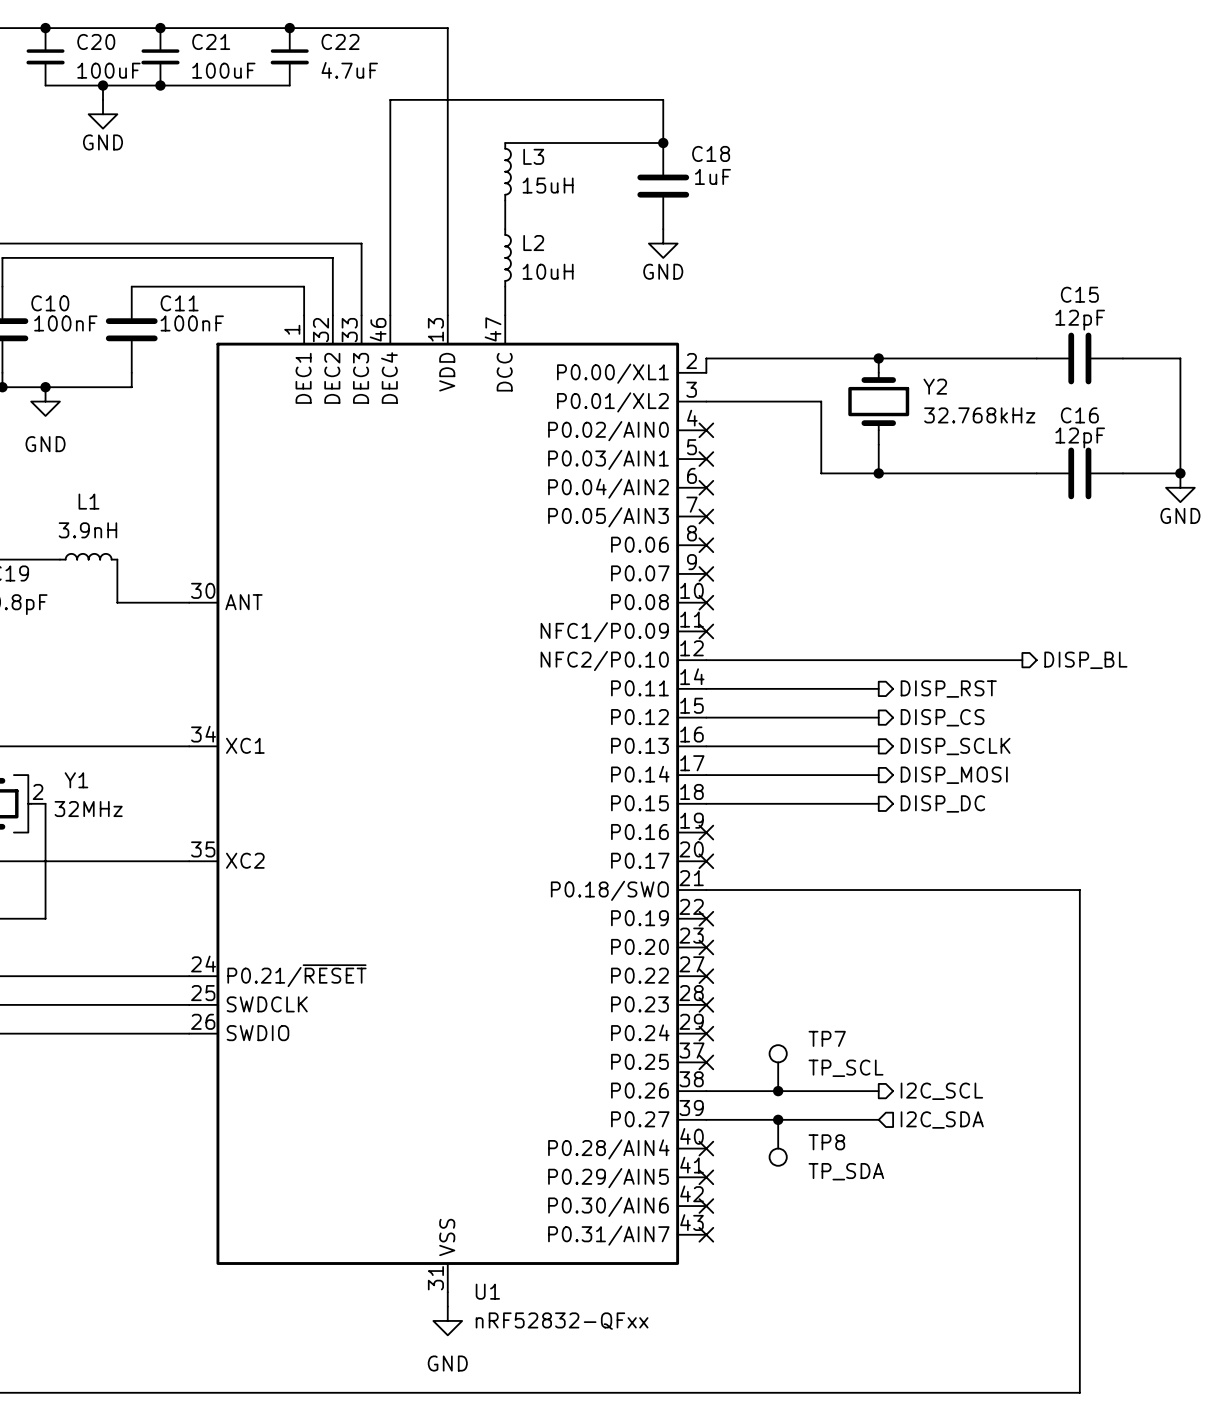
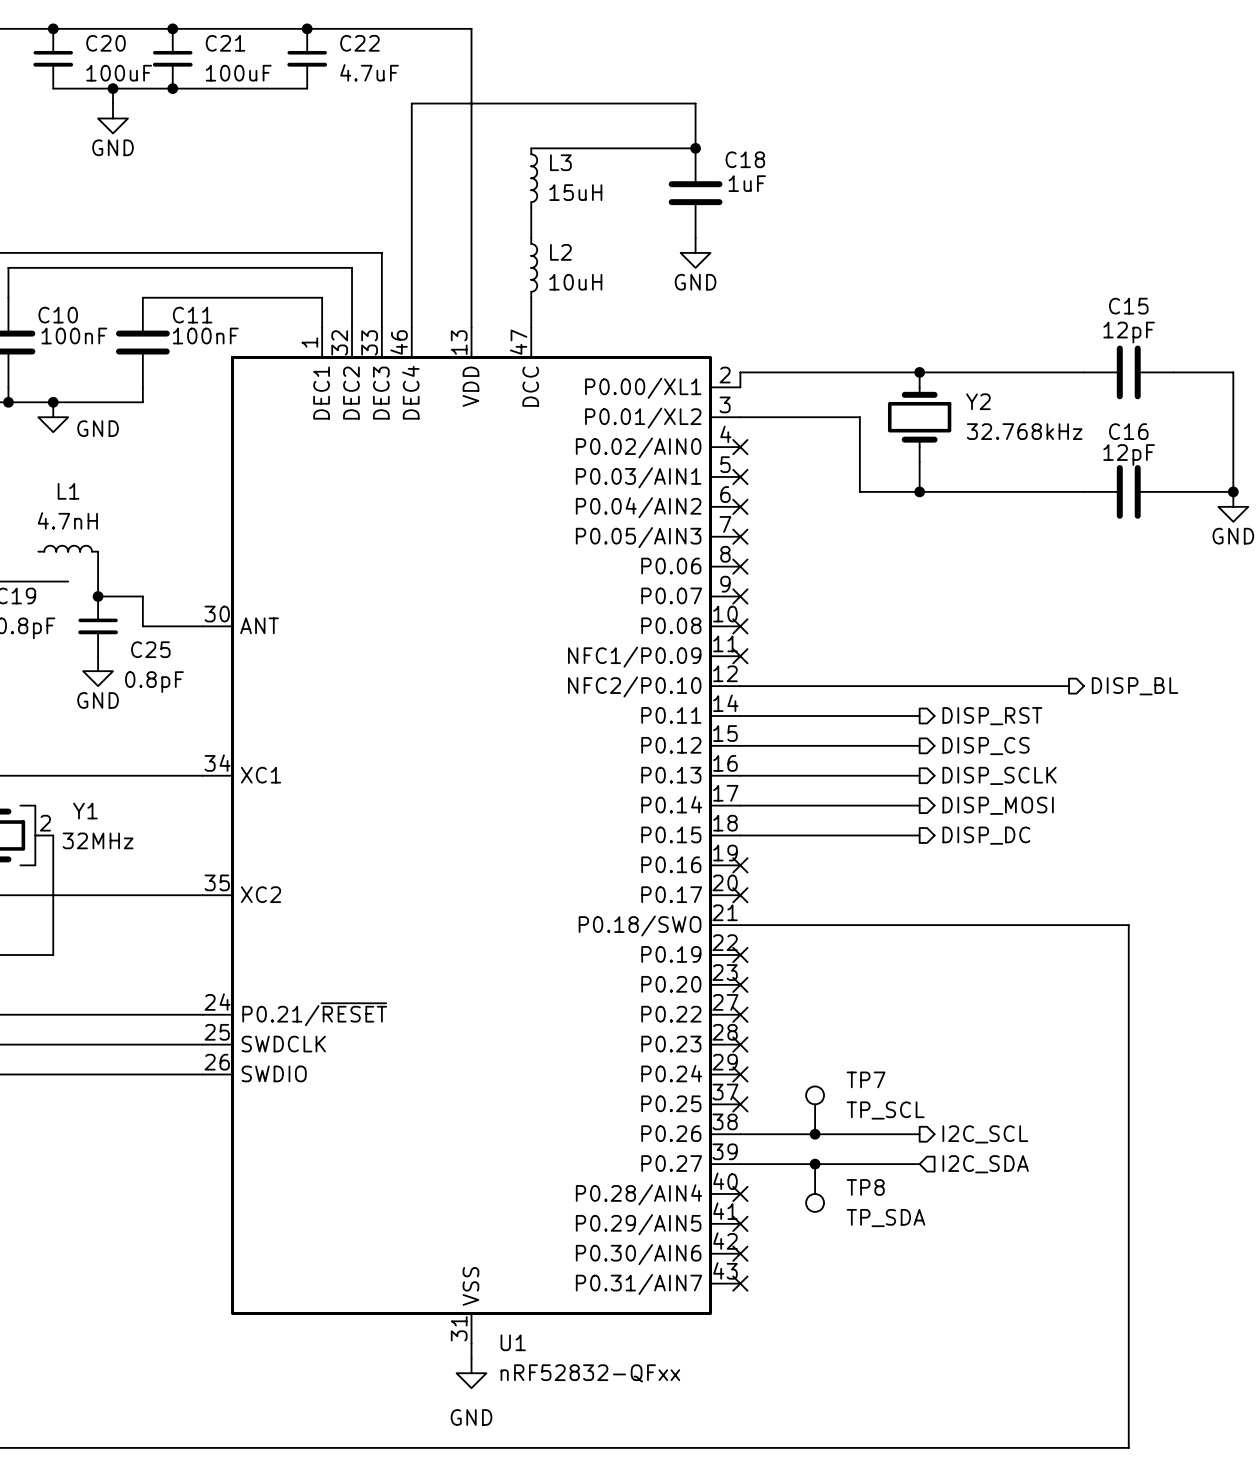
power symbol text position: GND (45, 444) -> GND (98, 428)
L1 value: 3.9nH (87, 530) -> 4.7nH (67, 520)
L1 position: (88, 556) -> (68, 548)
wire: (117, 559) (117, 602) (131, 602) -> (98, 551) (98, 596) (142, 596) (142, 626)
junction: none -> (98, 596)
C25: none -> 0.8pF (98, 626)
power symbol: none -> GND (98, 671)

